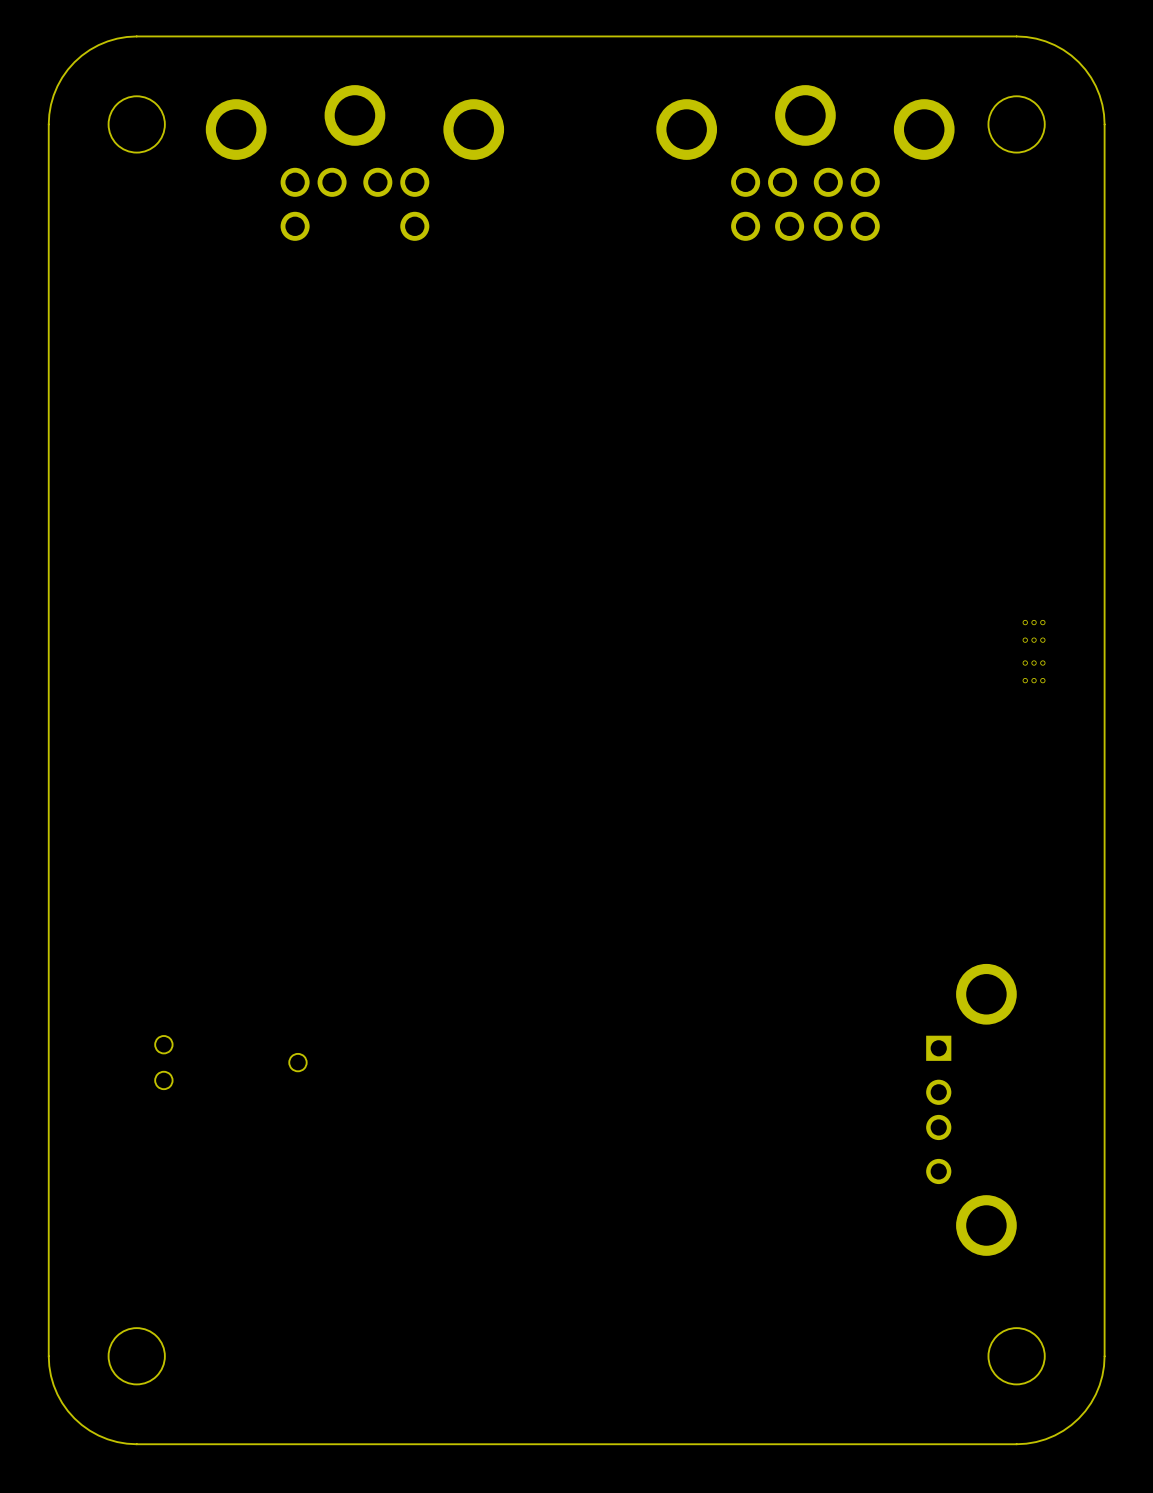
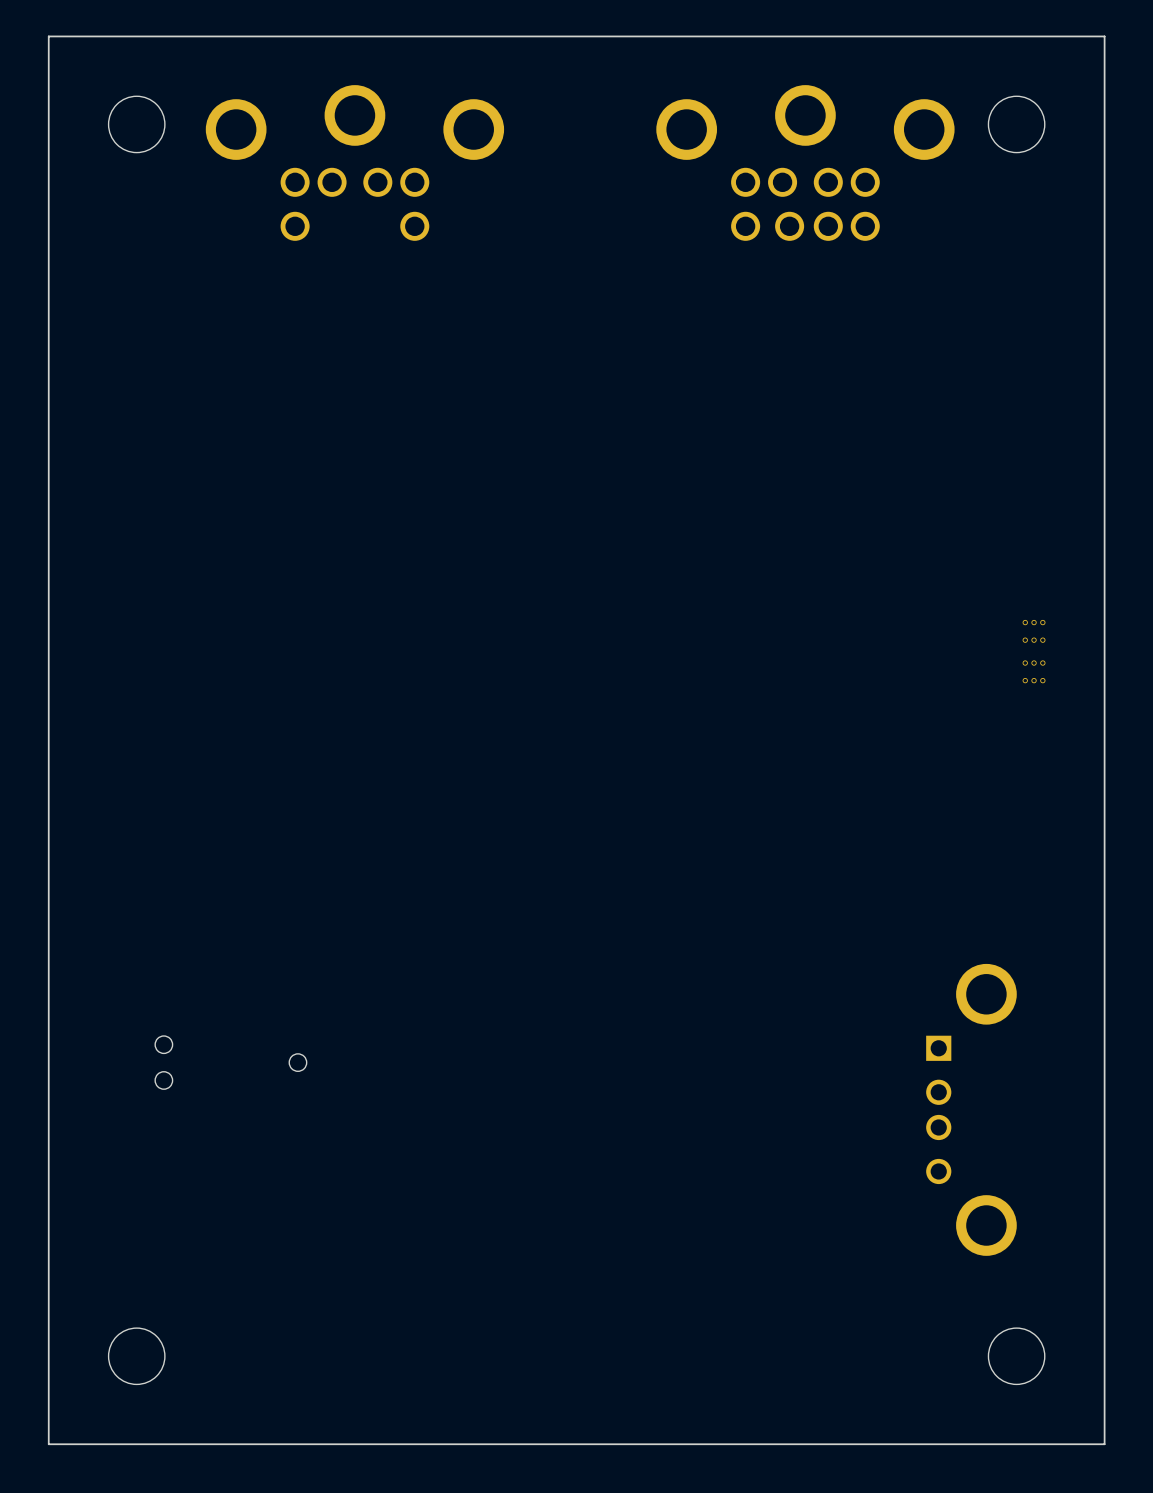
board edge: (136, 36) (117, 38) (98, 45) (74, 62) (62, 77) (53, 95) (48, 124) -> (136, 36) (48, 36) (48, 124)
board edge: (1016, 36) (1045, 41) (1063, 49) (1078, 62) (1091, 77) (1099, 95) (1104, 124) -> (1016, 36) (1104, 36) (1104, 124)
board edge: (48, 1356) (50, 1375) (57, 1394) (74, 1418) (98, 1435) (117, 1442) (136, 1444) -> (48, 1356) (48, 1444) (136, 1444)
board edge: (1104, 1356) (1102, 1375) (1095, 1394) (1078, 1418) (1063, 1430) (1045, 1439) (1016, 1444) -> (1104, 1356) (1104, 1444) (1016, 1444)

